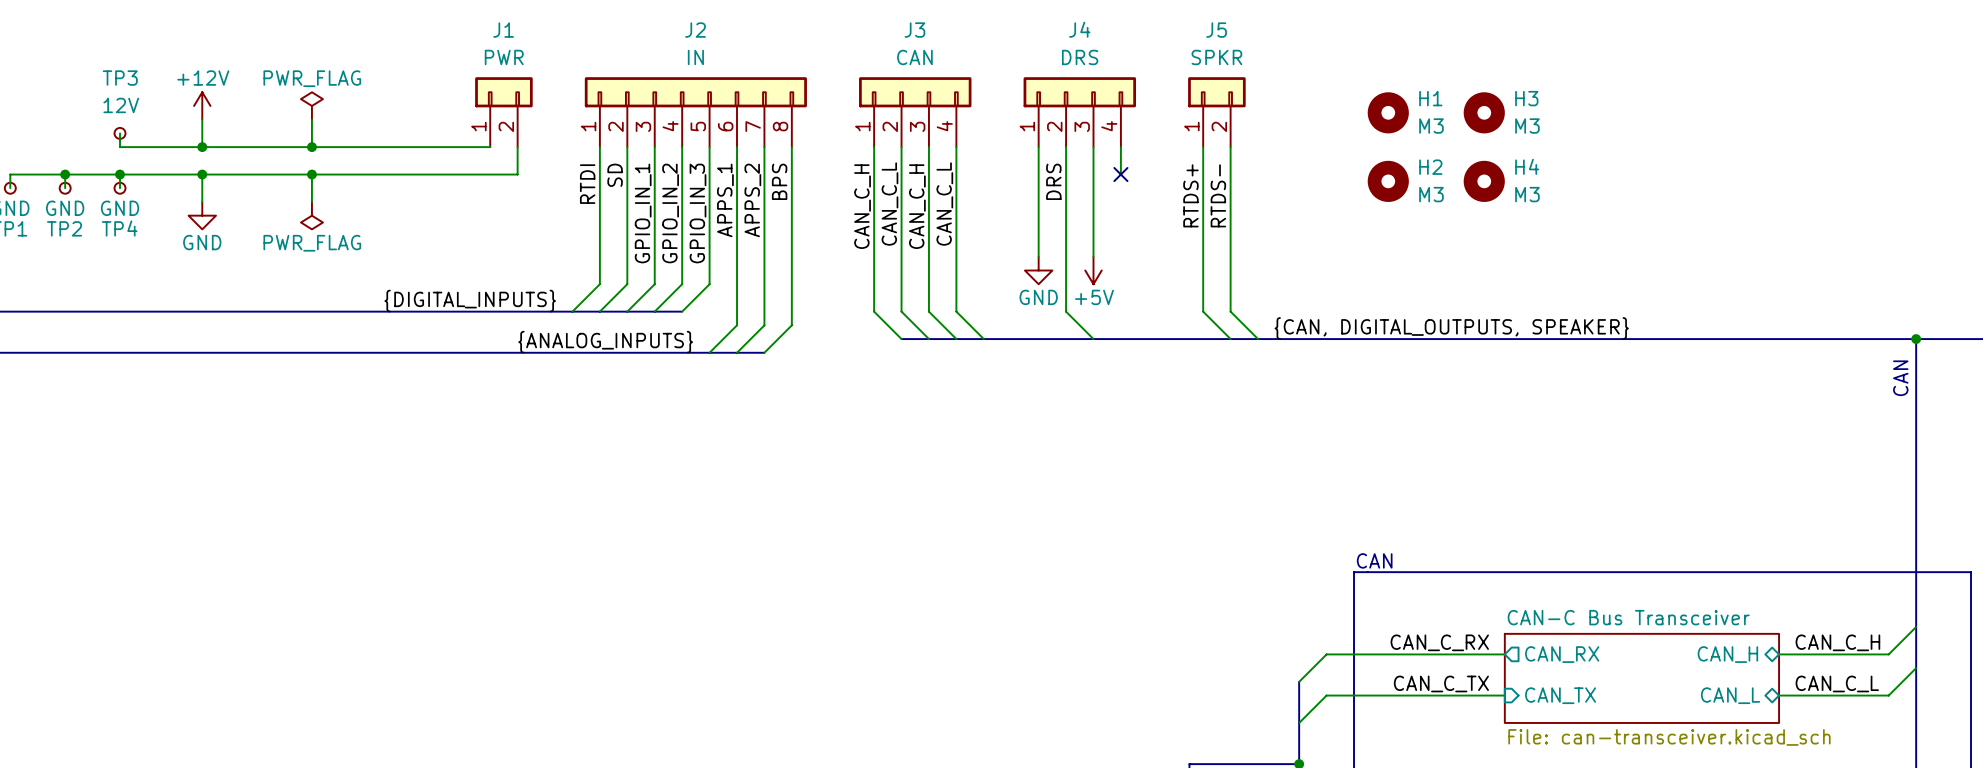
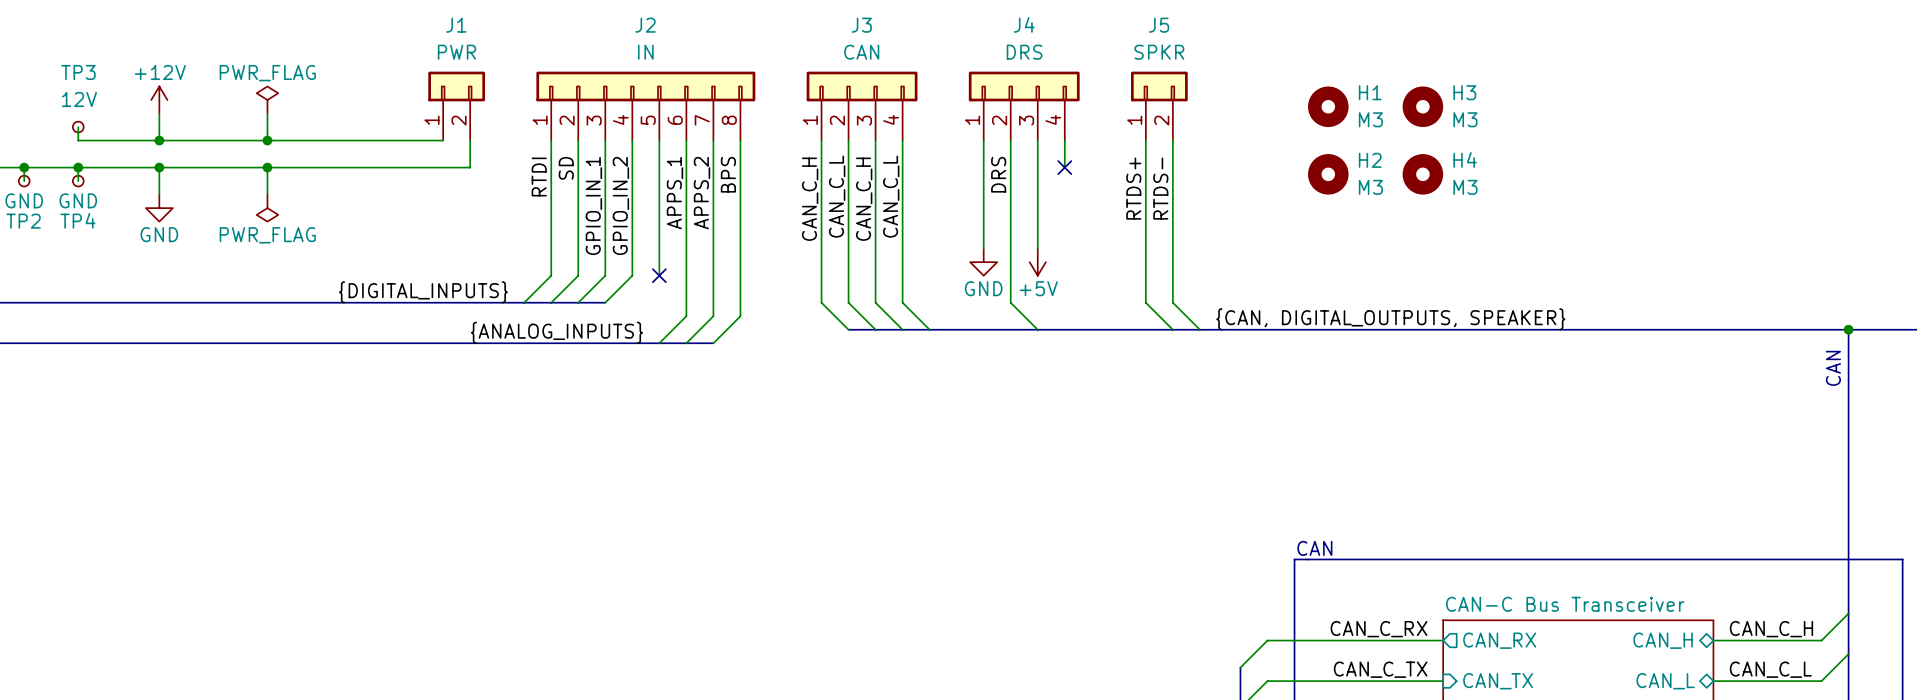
label: GPIO_IN_3 (698, 213) -> none
wire: (709, 284) (682, 311) -> none
no-connect mark: none -> (659, 275)
bus: (654, 311) (682, 311) -> none

